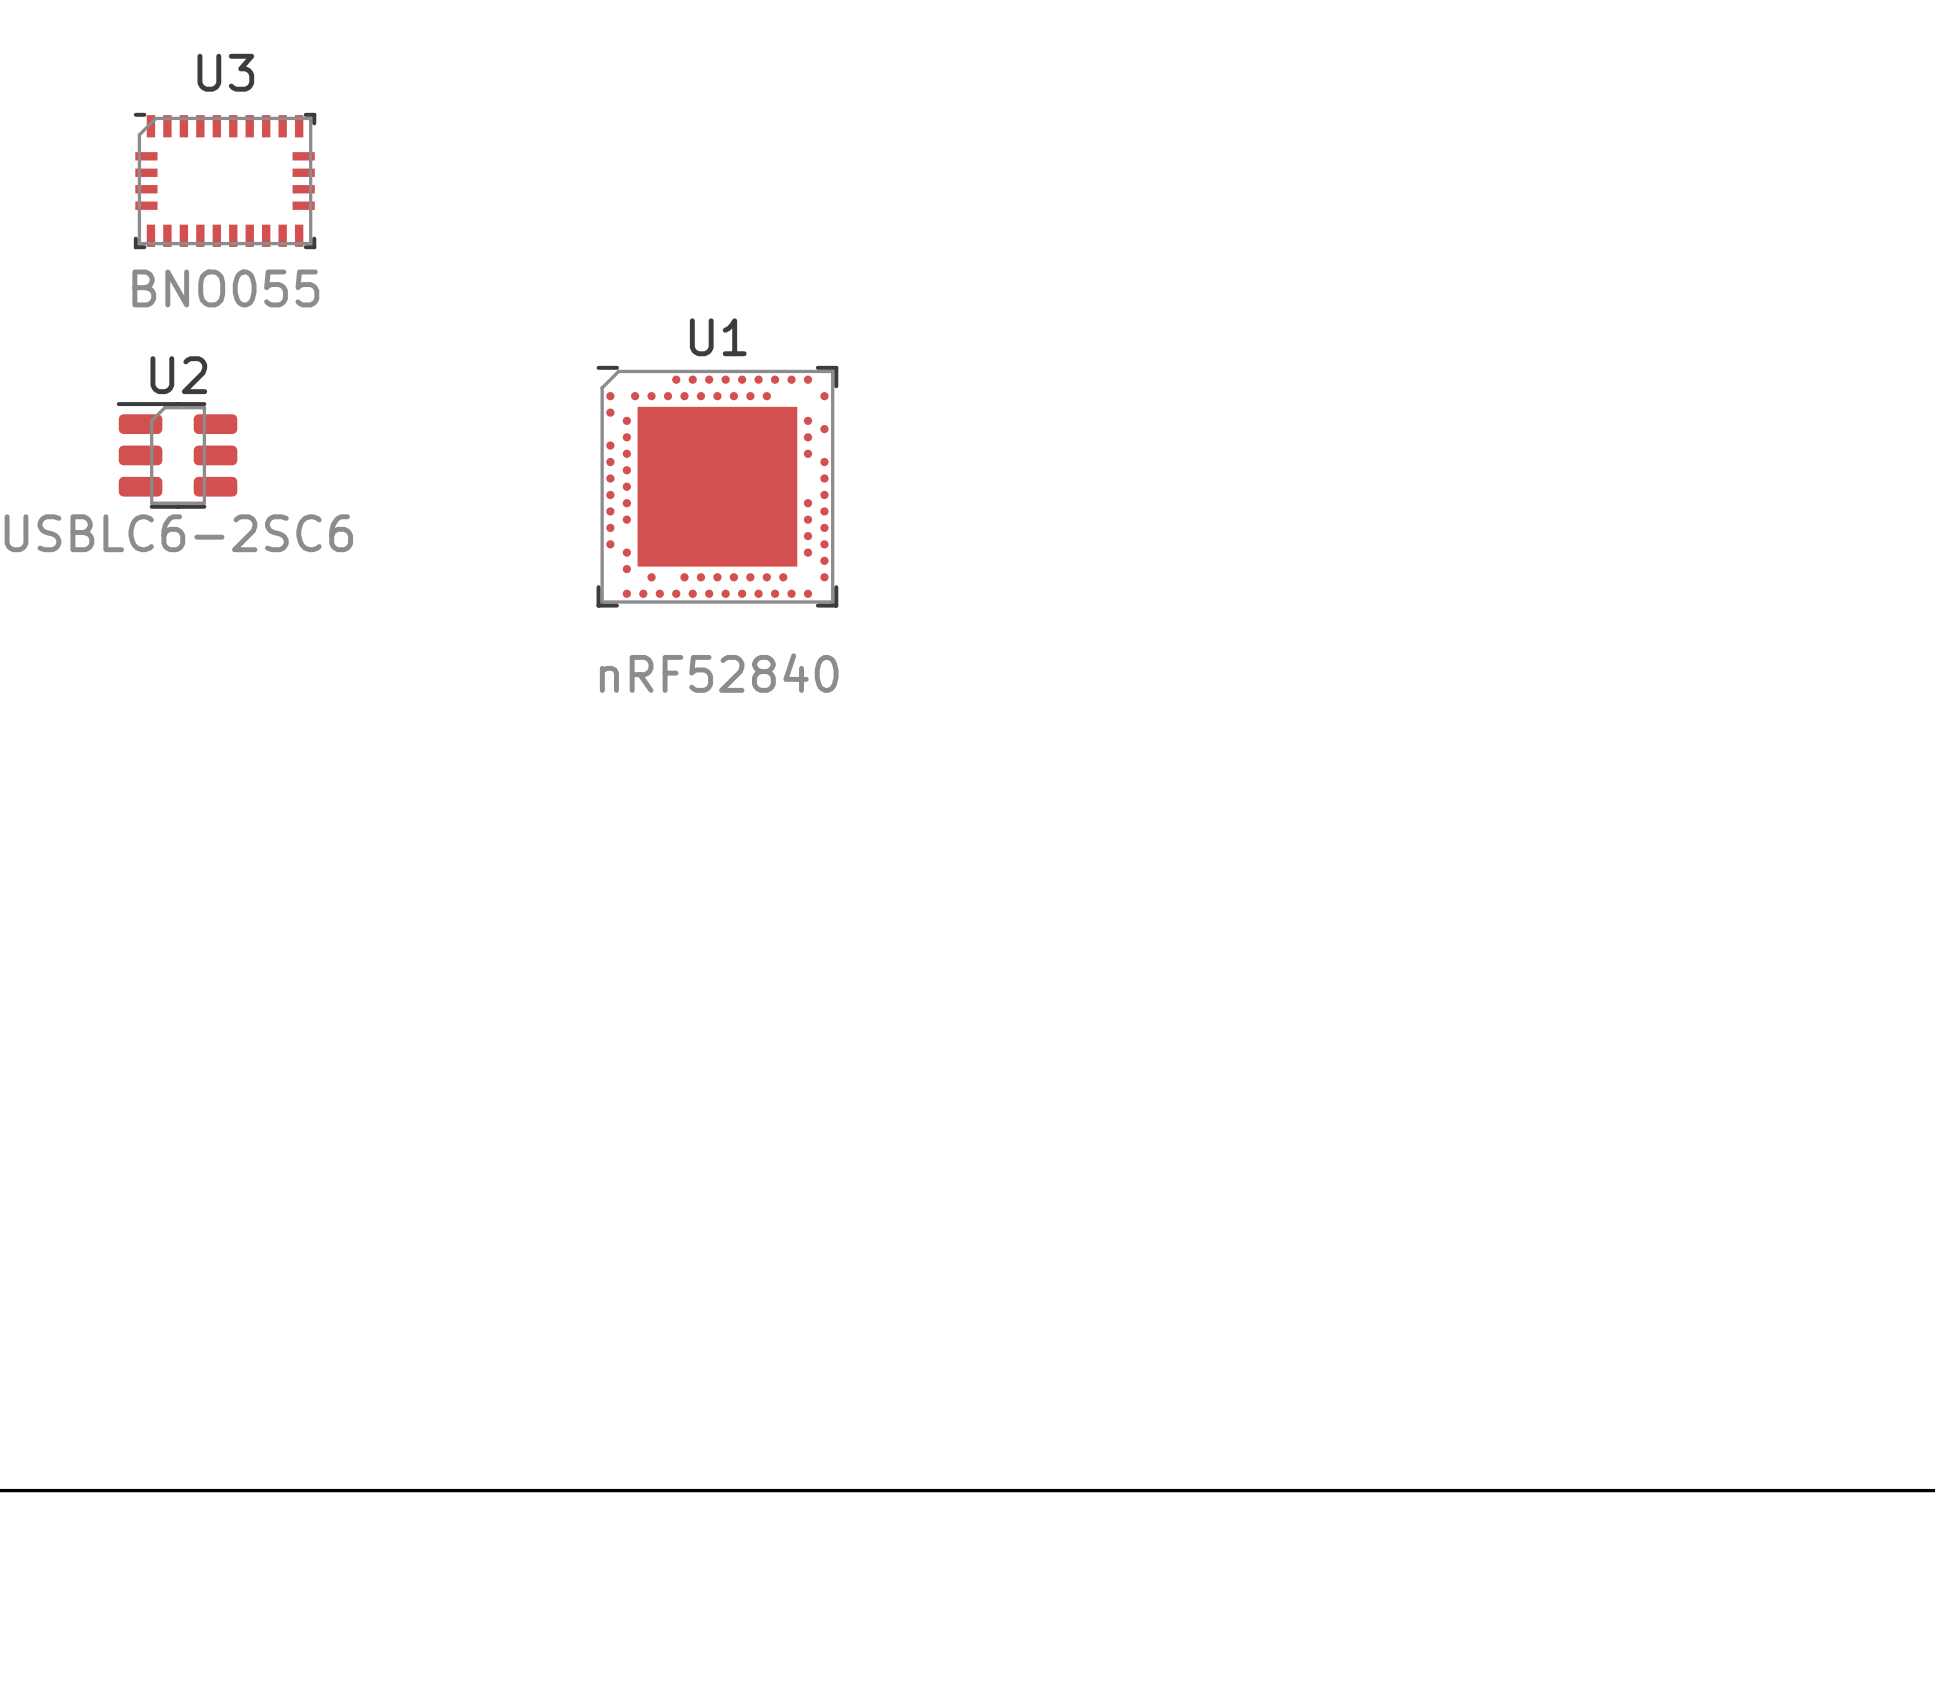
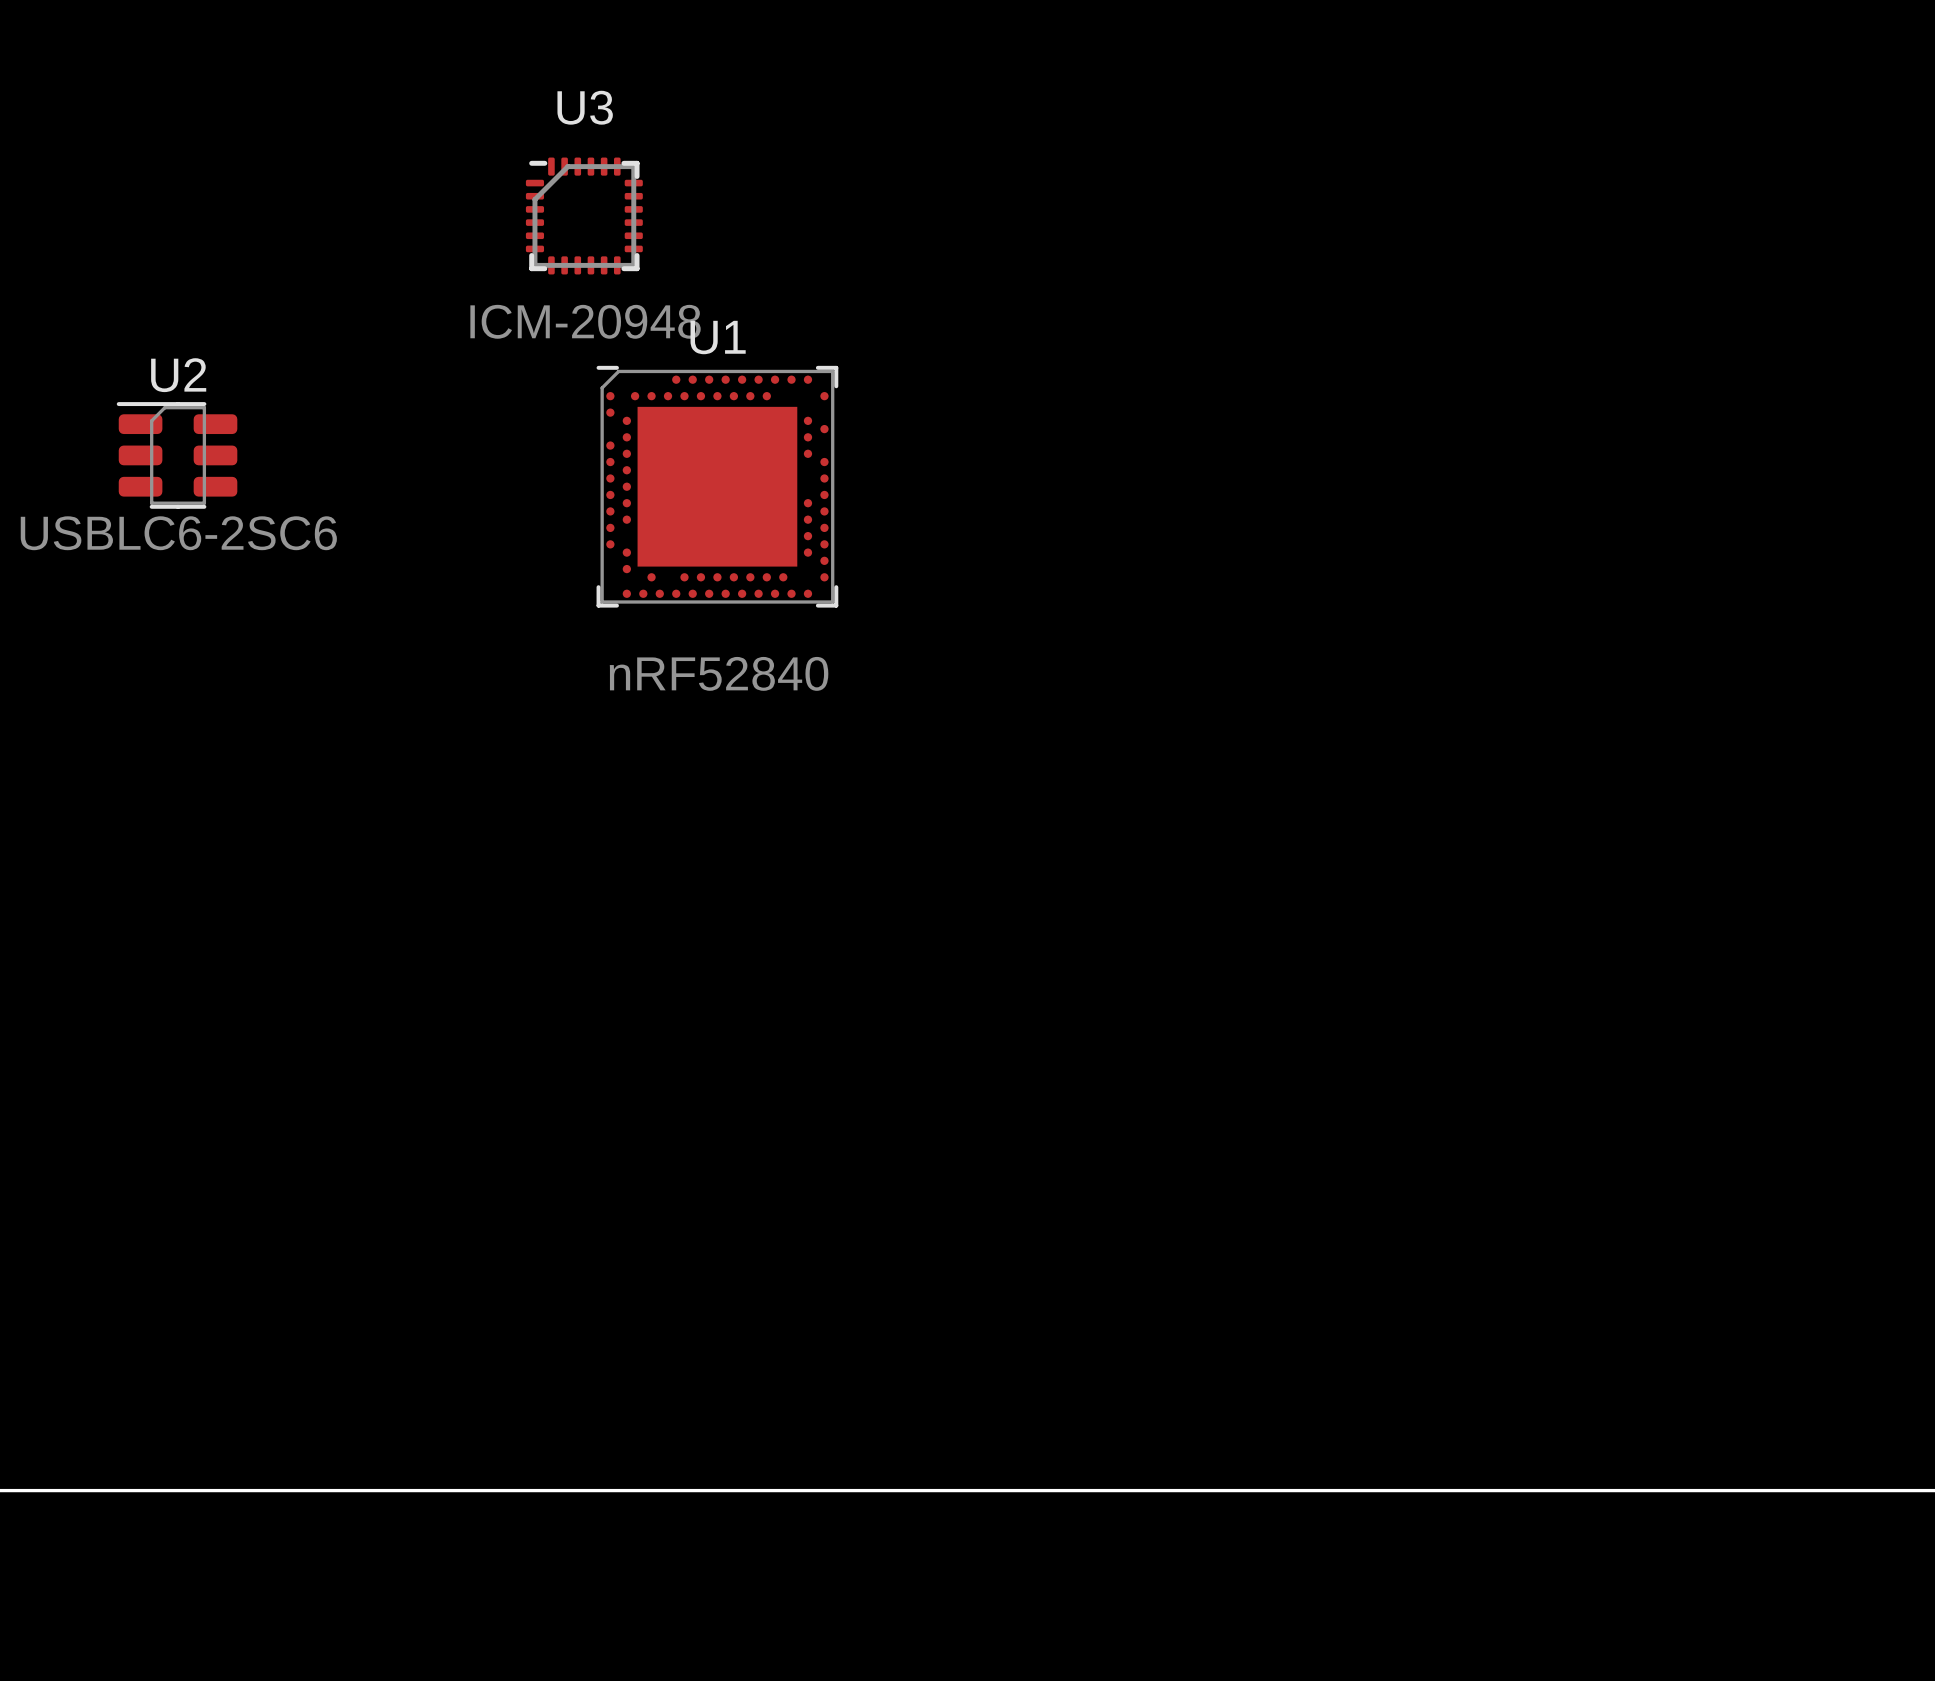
U3 footprint: [133, 112, 317, 250] -> [525, 157, 643, 275]
U3 value: BNO055 (225, 288) -> ICM-20948 (585, 321)

